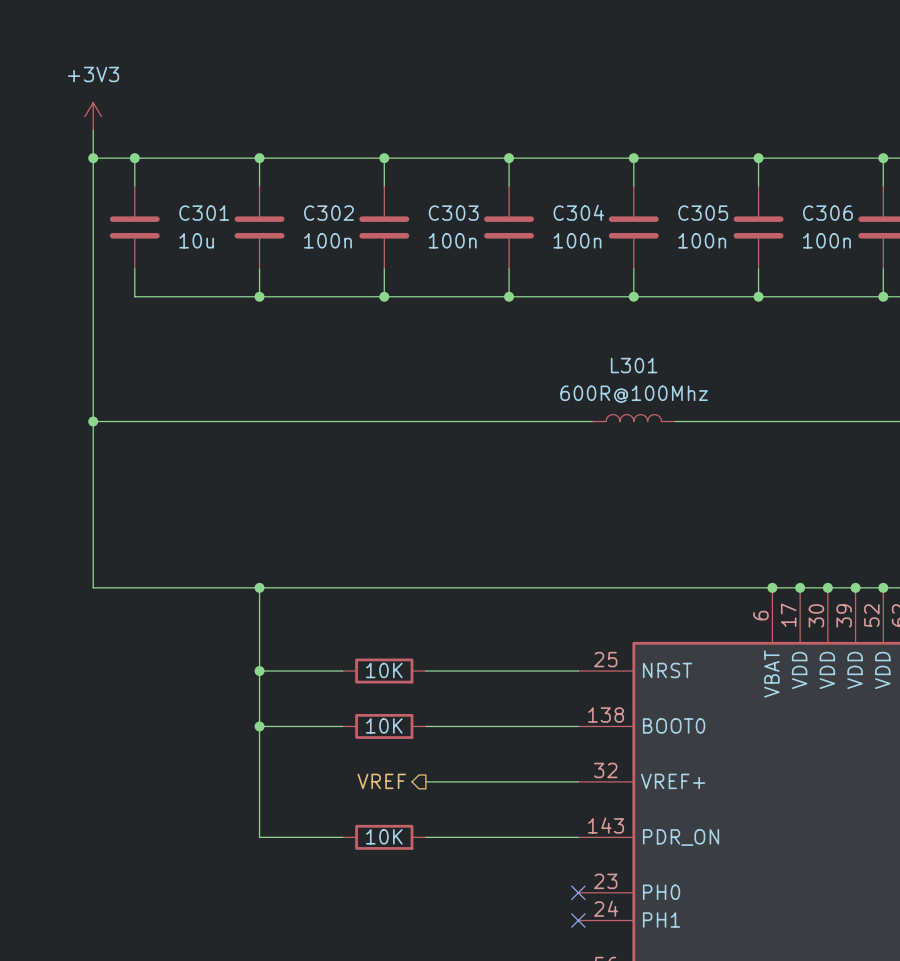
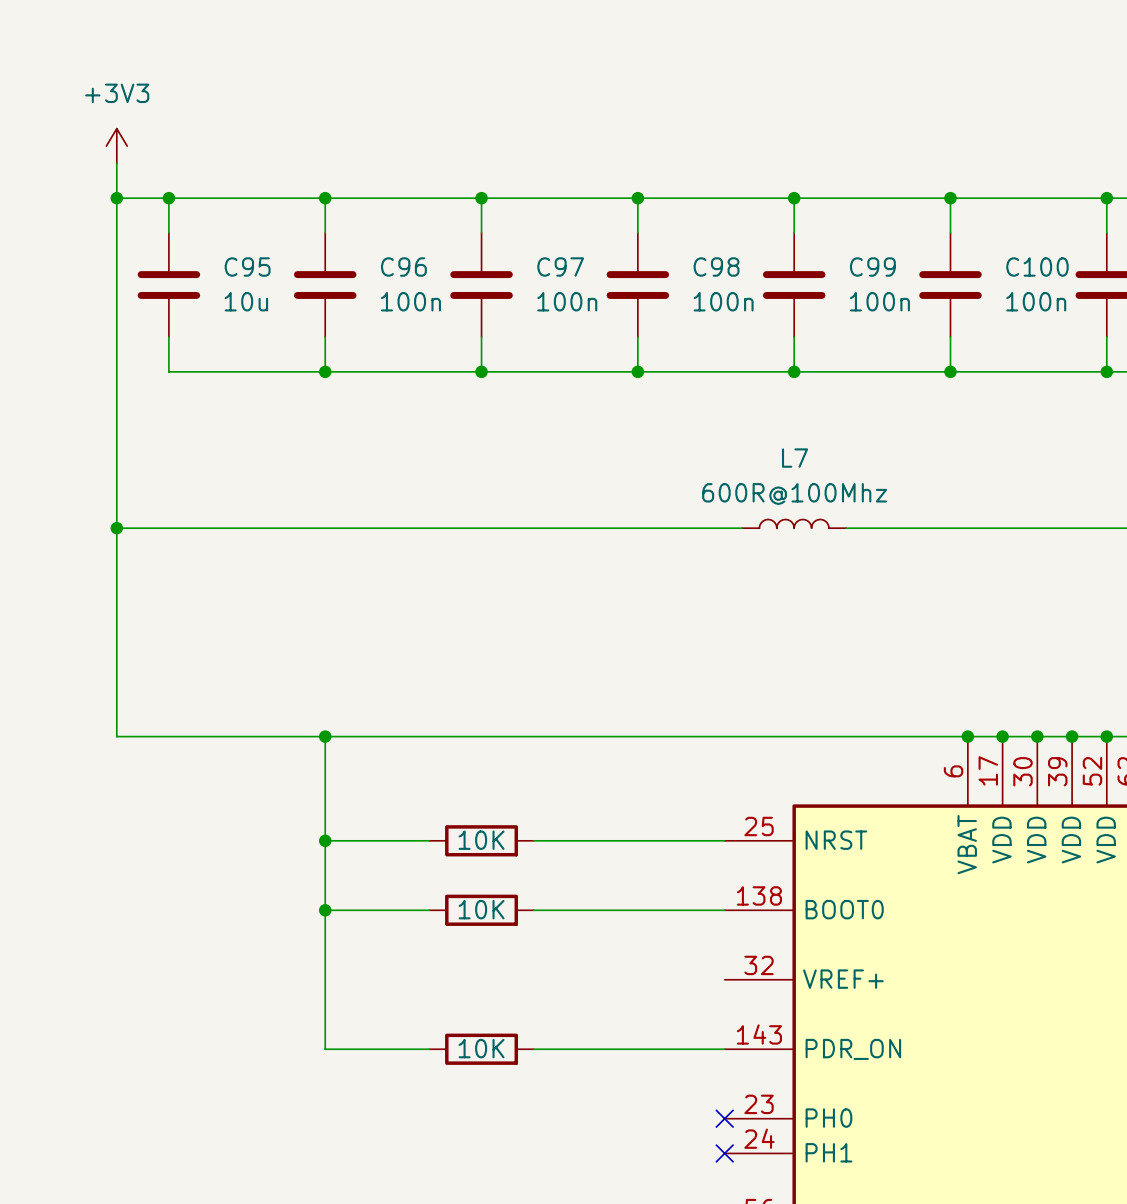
C304 name: C304 (578, 212) -> C98 (716, 267)
C301 name: C301 (204, 213) -> C95 (247, 267)
C302 name: C302 (328, 213) -> C96 (403, 267)
C303 name: C303 (453, 213) -> C97 (560, 267)
C305 name: C305 (703, 213) -> C99 (872, 267)
C306 name: C306 (827, 213) -> C100 (1037, 267)
L301 name: L301 (634, 365) -> L7 (795, 458)
hierarchical label: VREF (381, 781) -> none
wire: (425, 781) (578, 781) -> none

